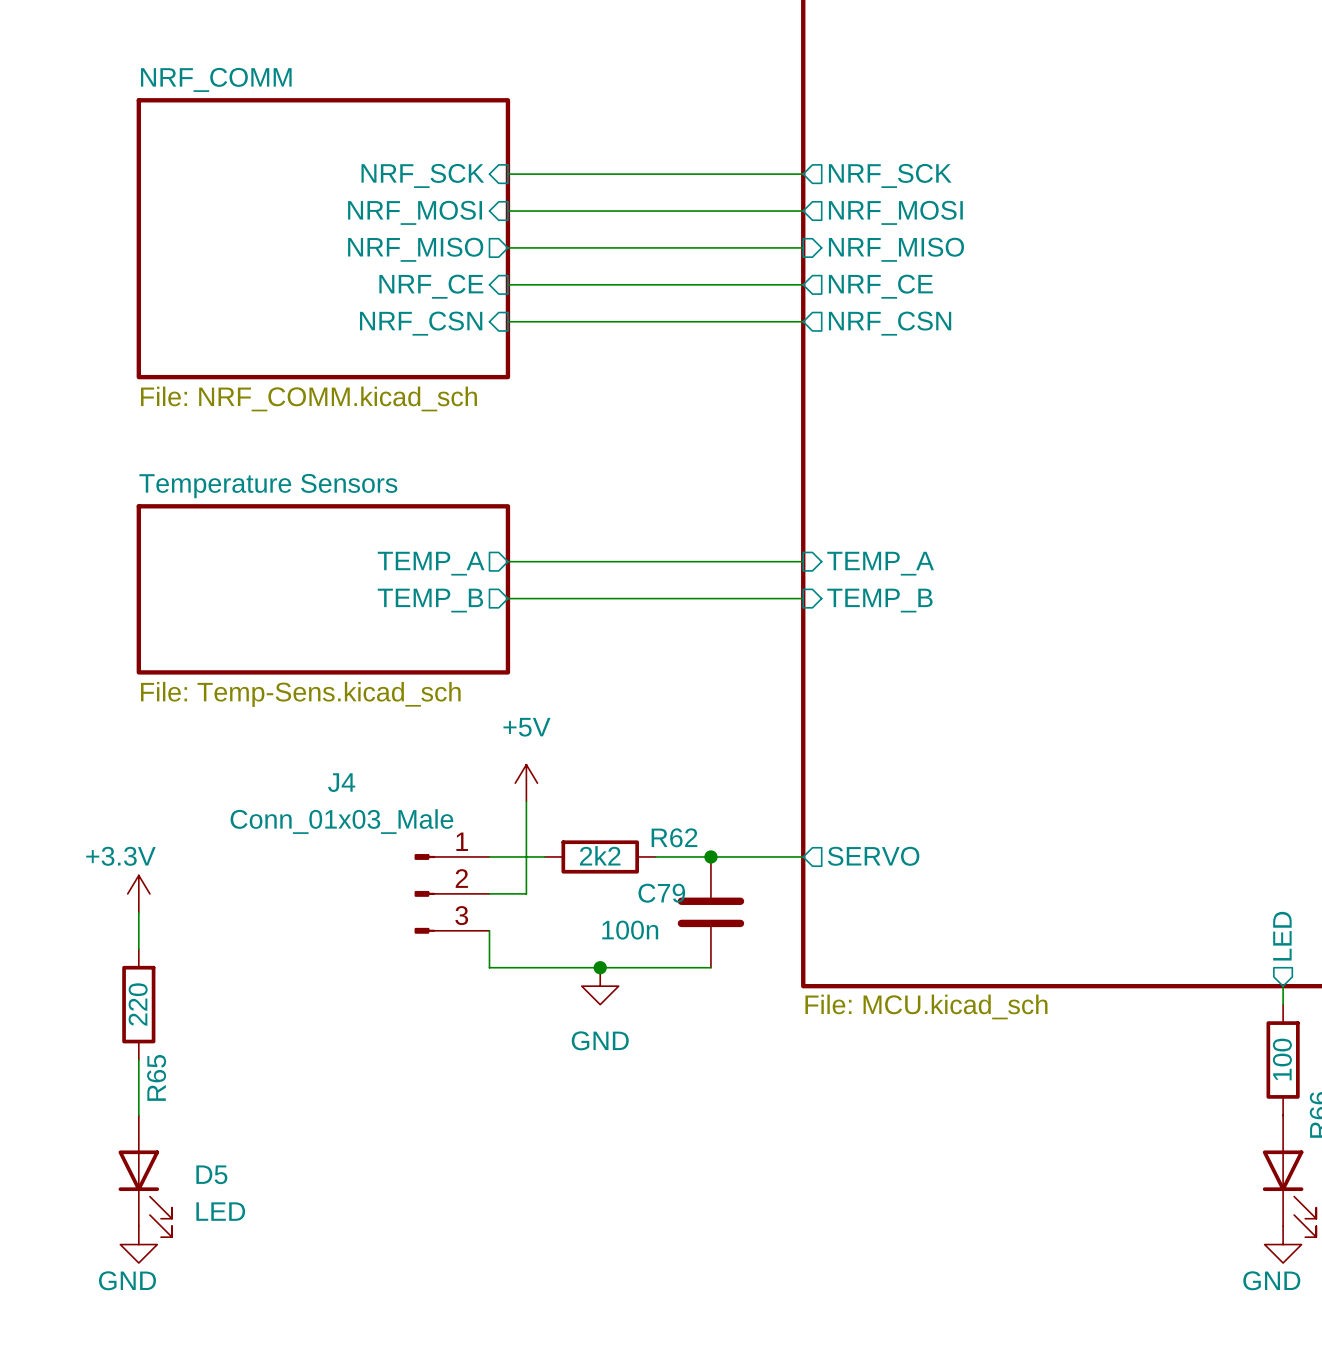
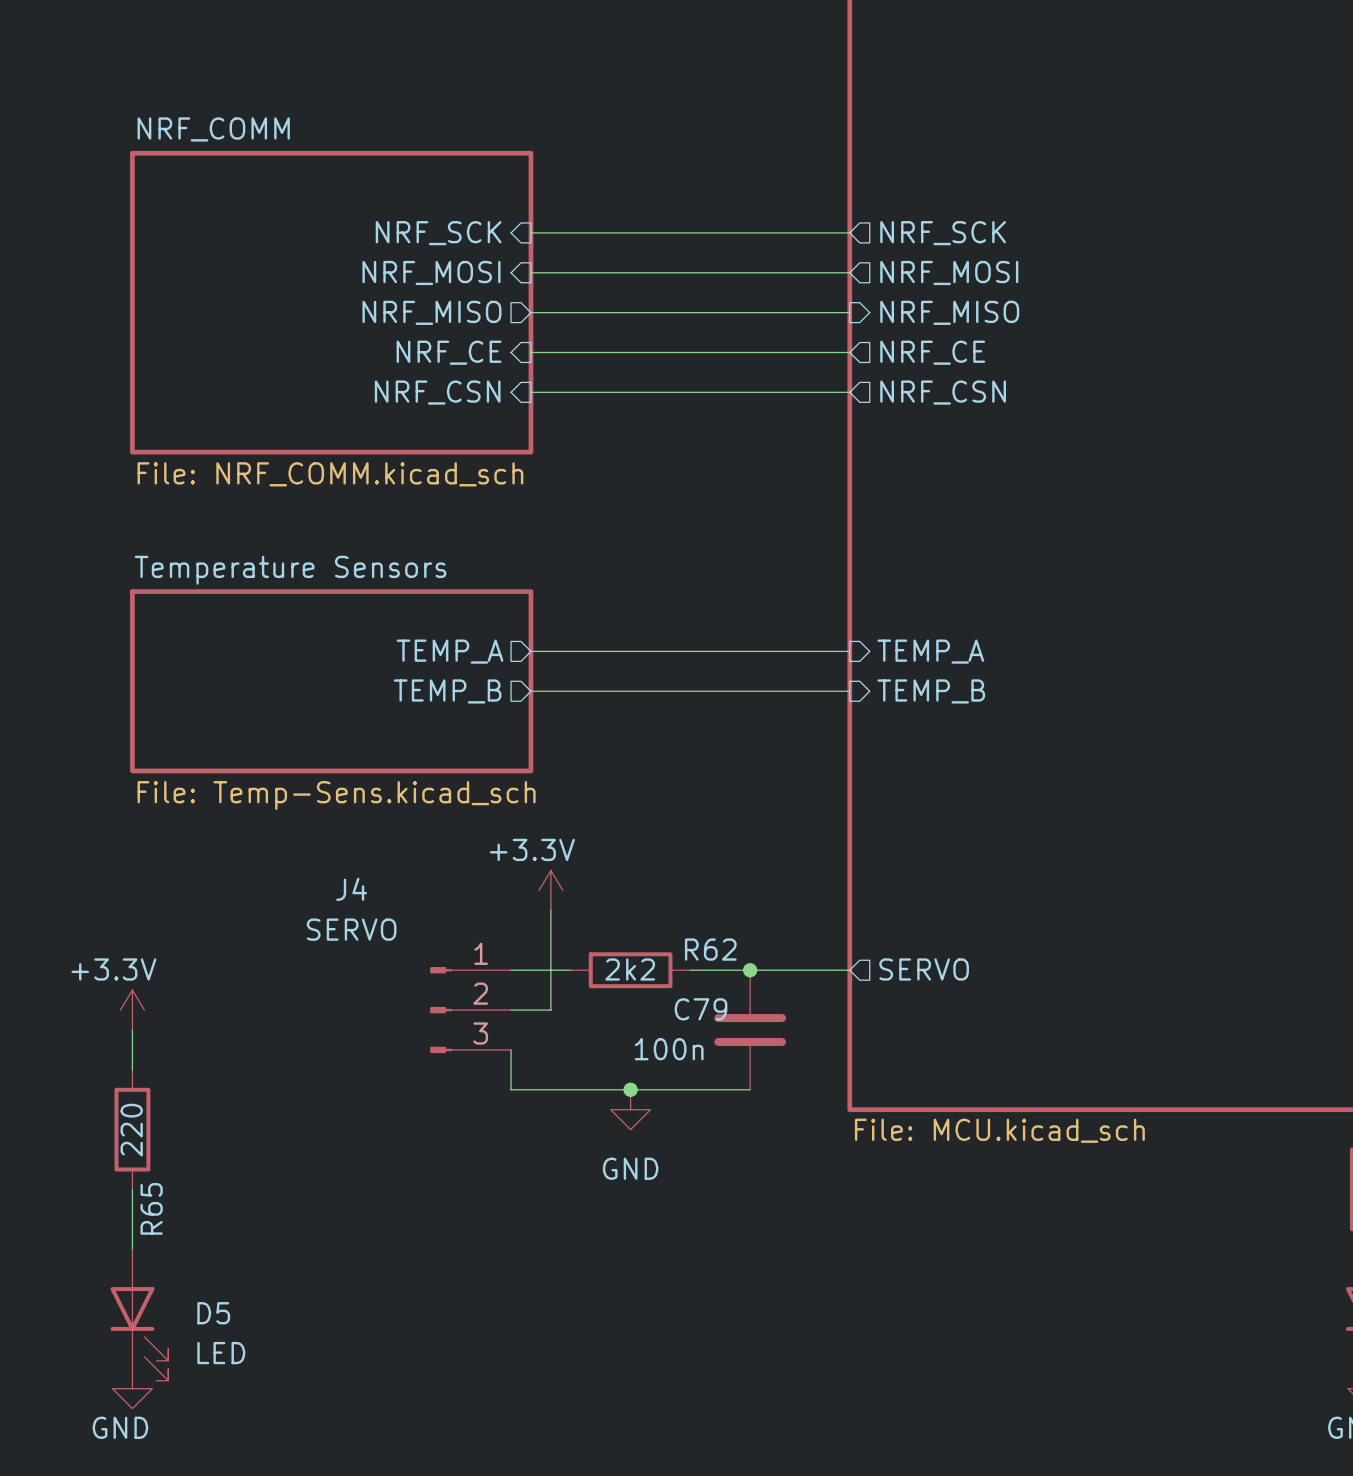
power symbol: +5V (526, 783) -> +3.3V (550, 890)
J4 value: Conn_01x03_Male (341, 821) -> SERVO (351, 929)

